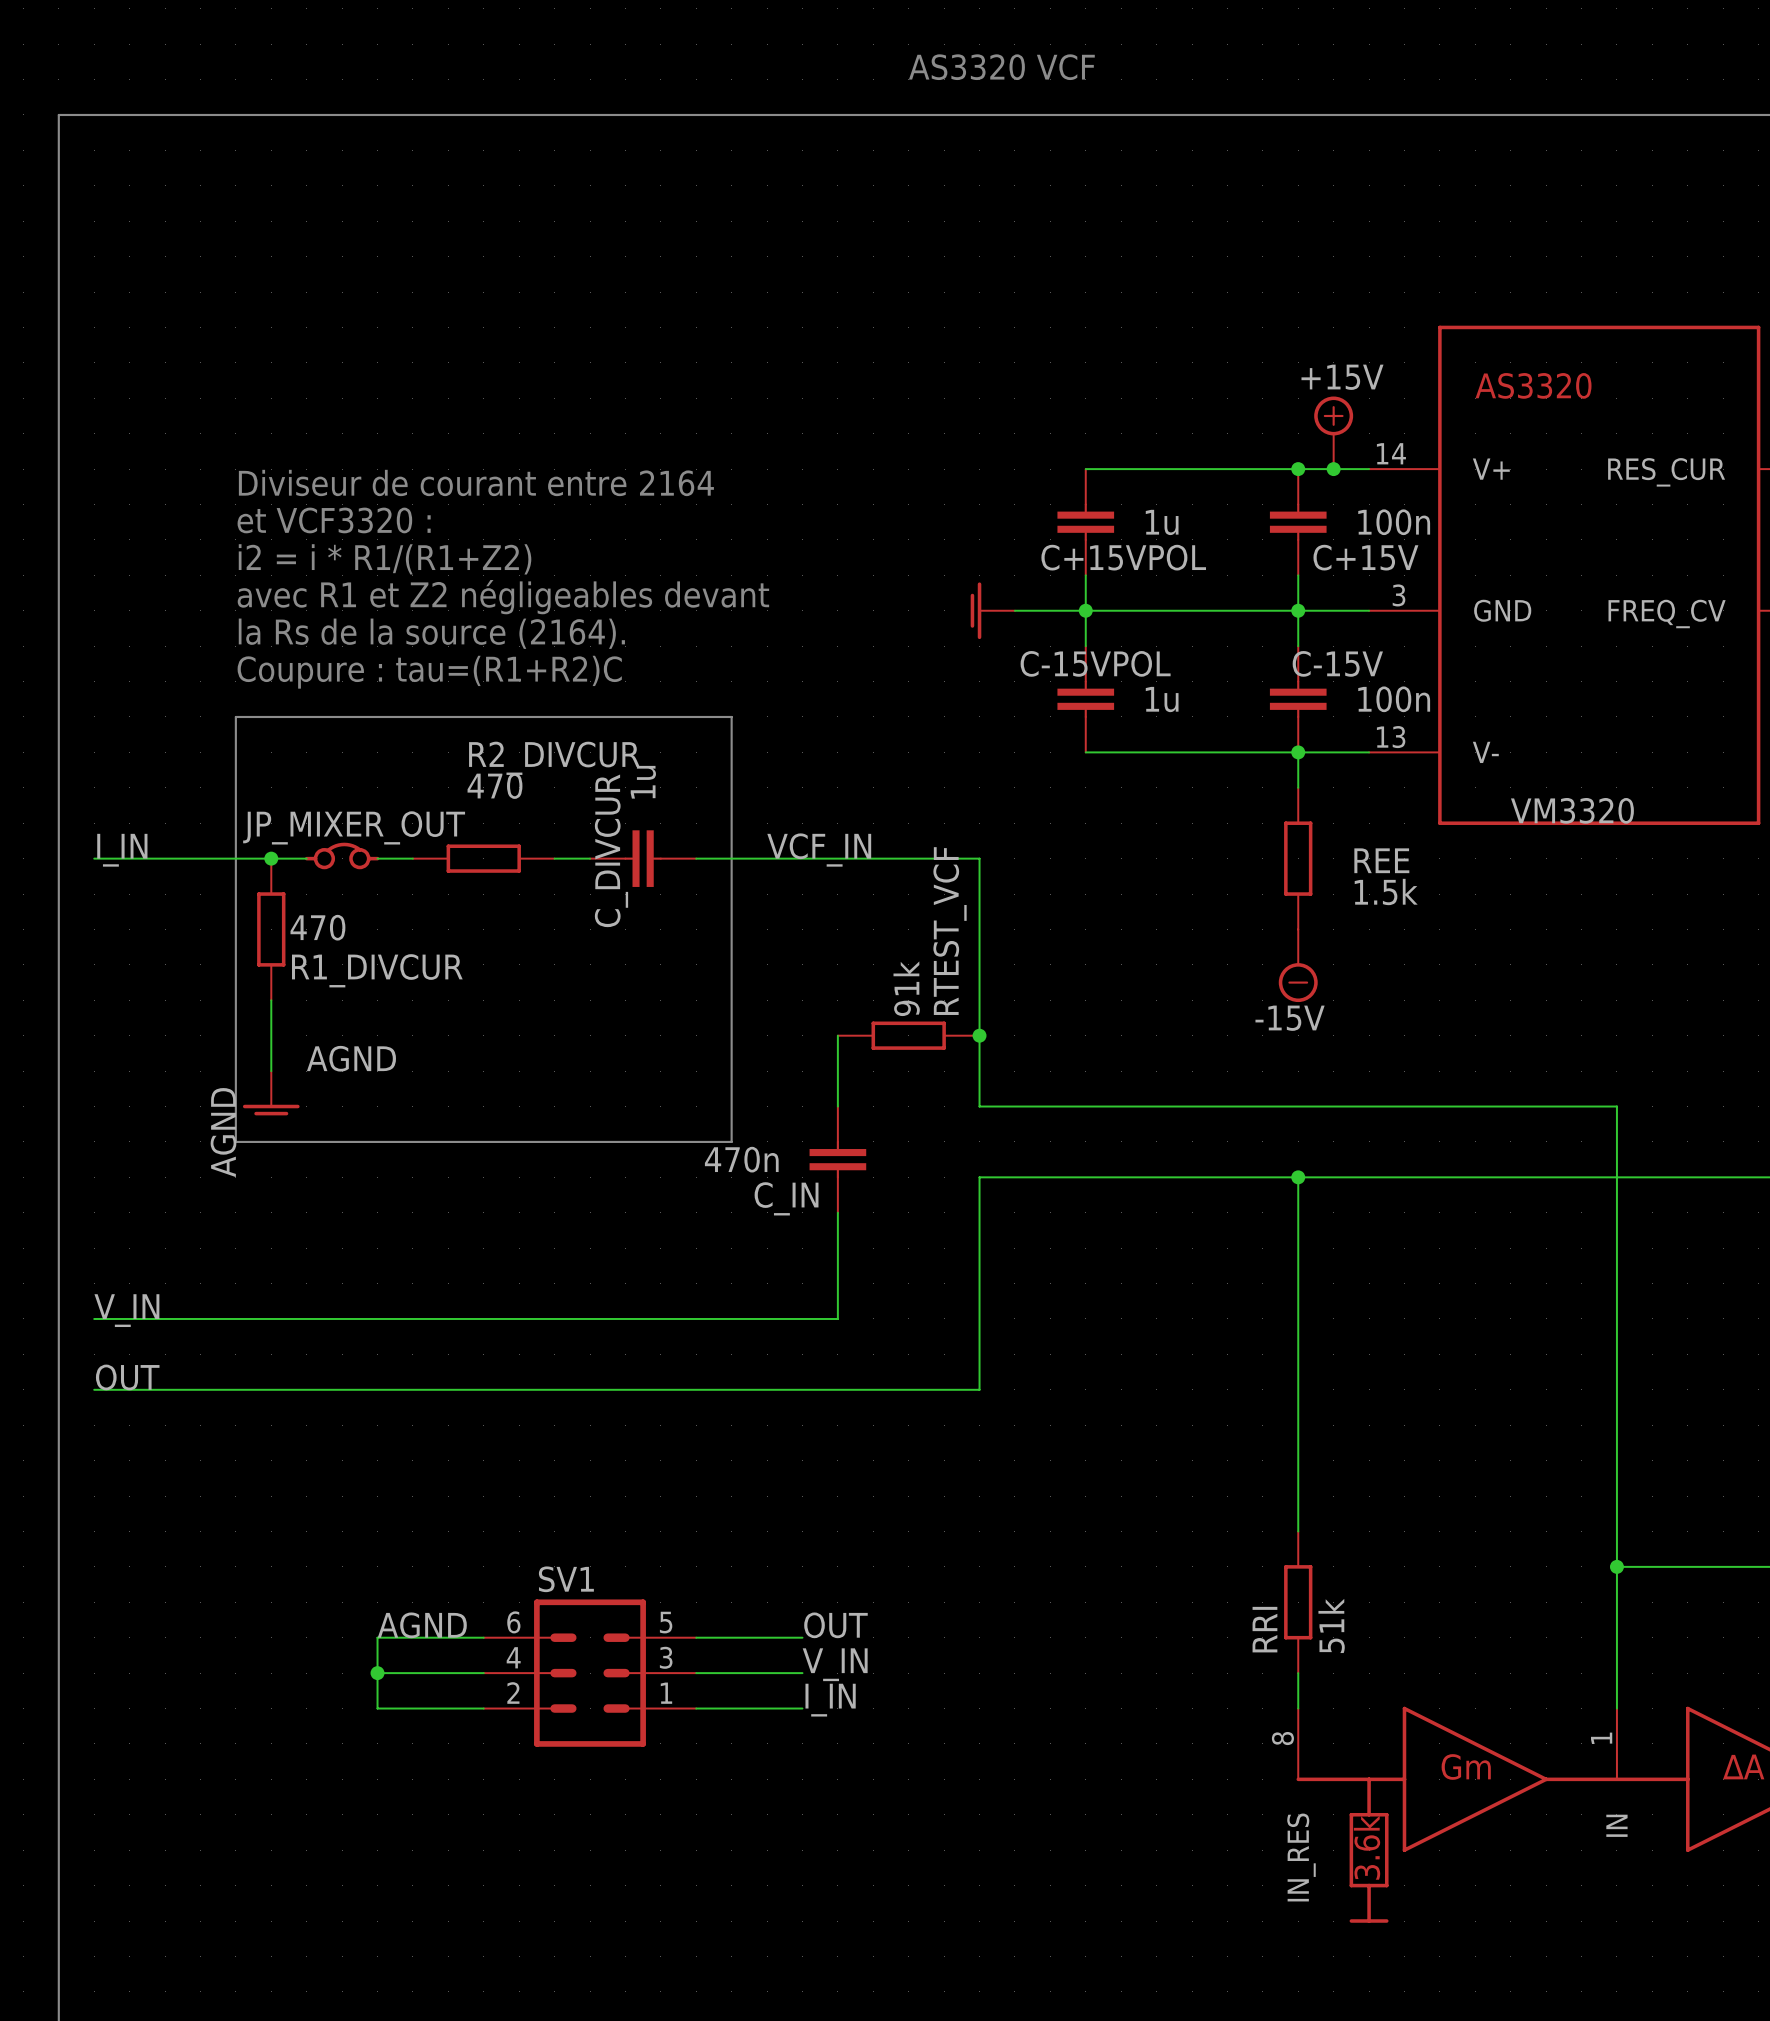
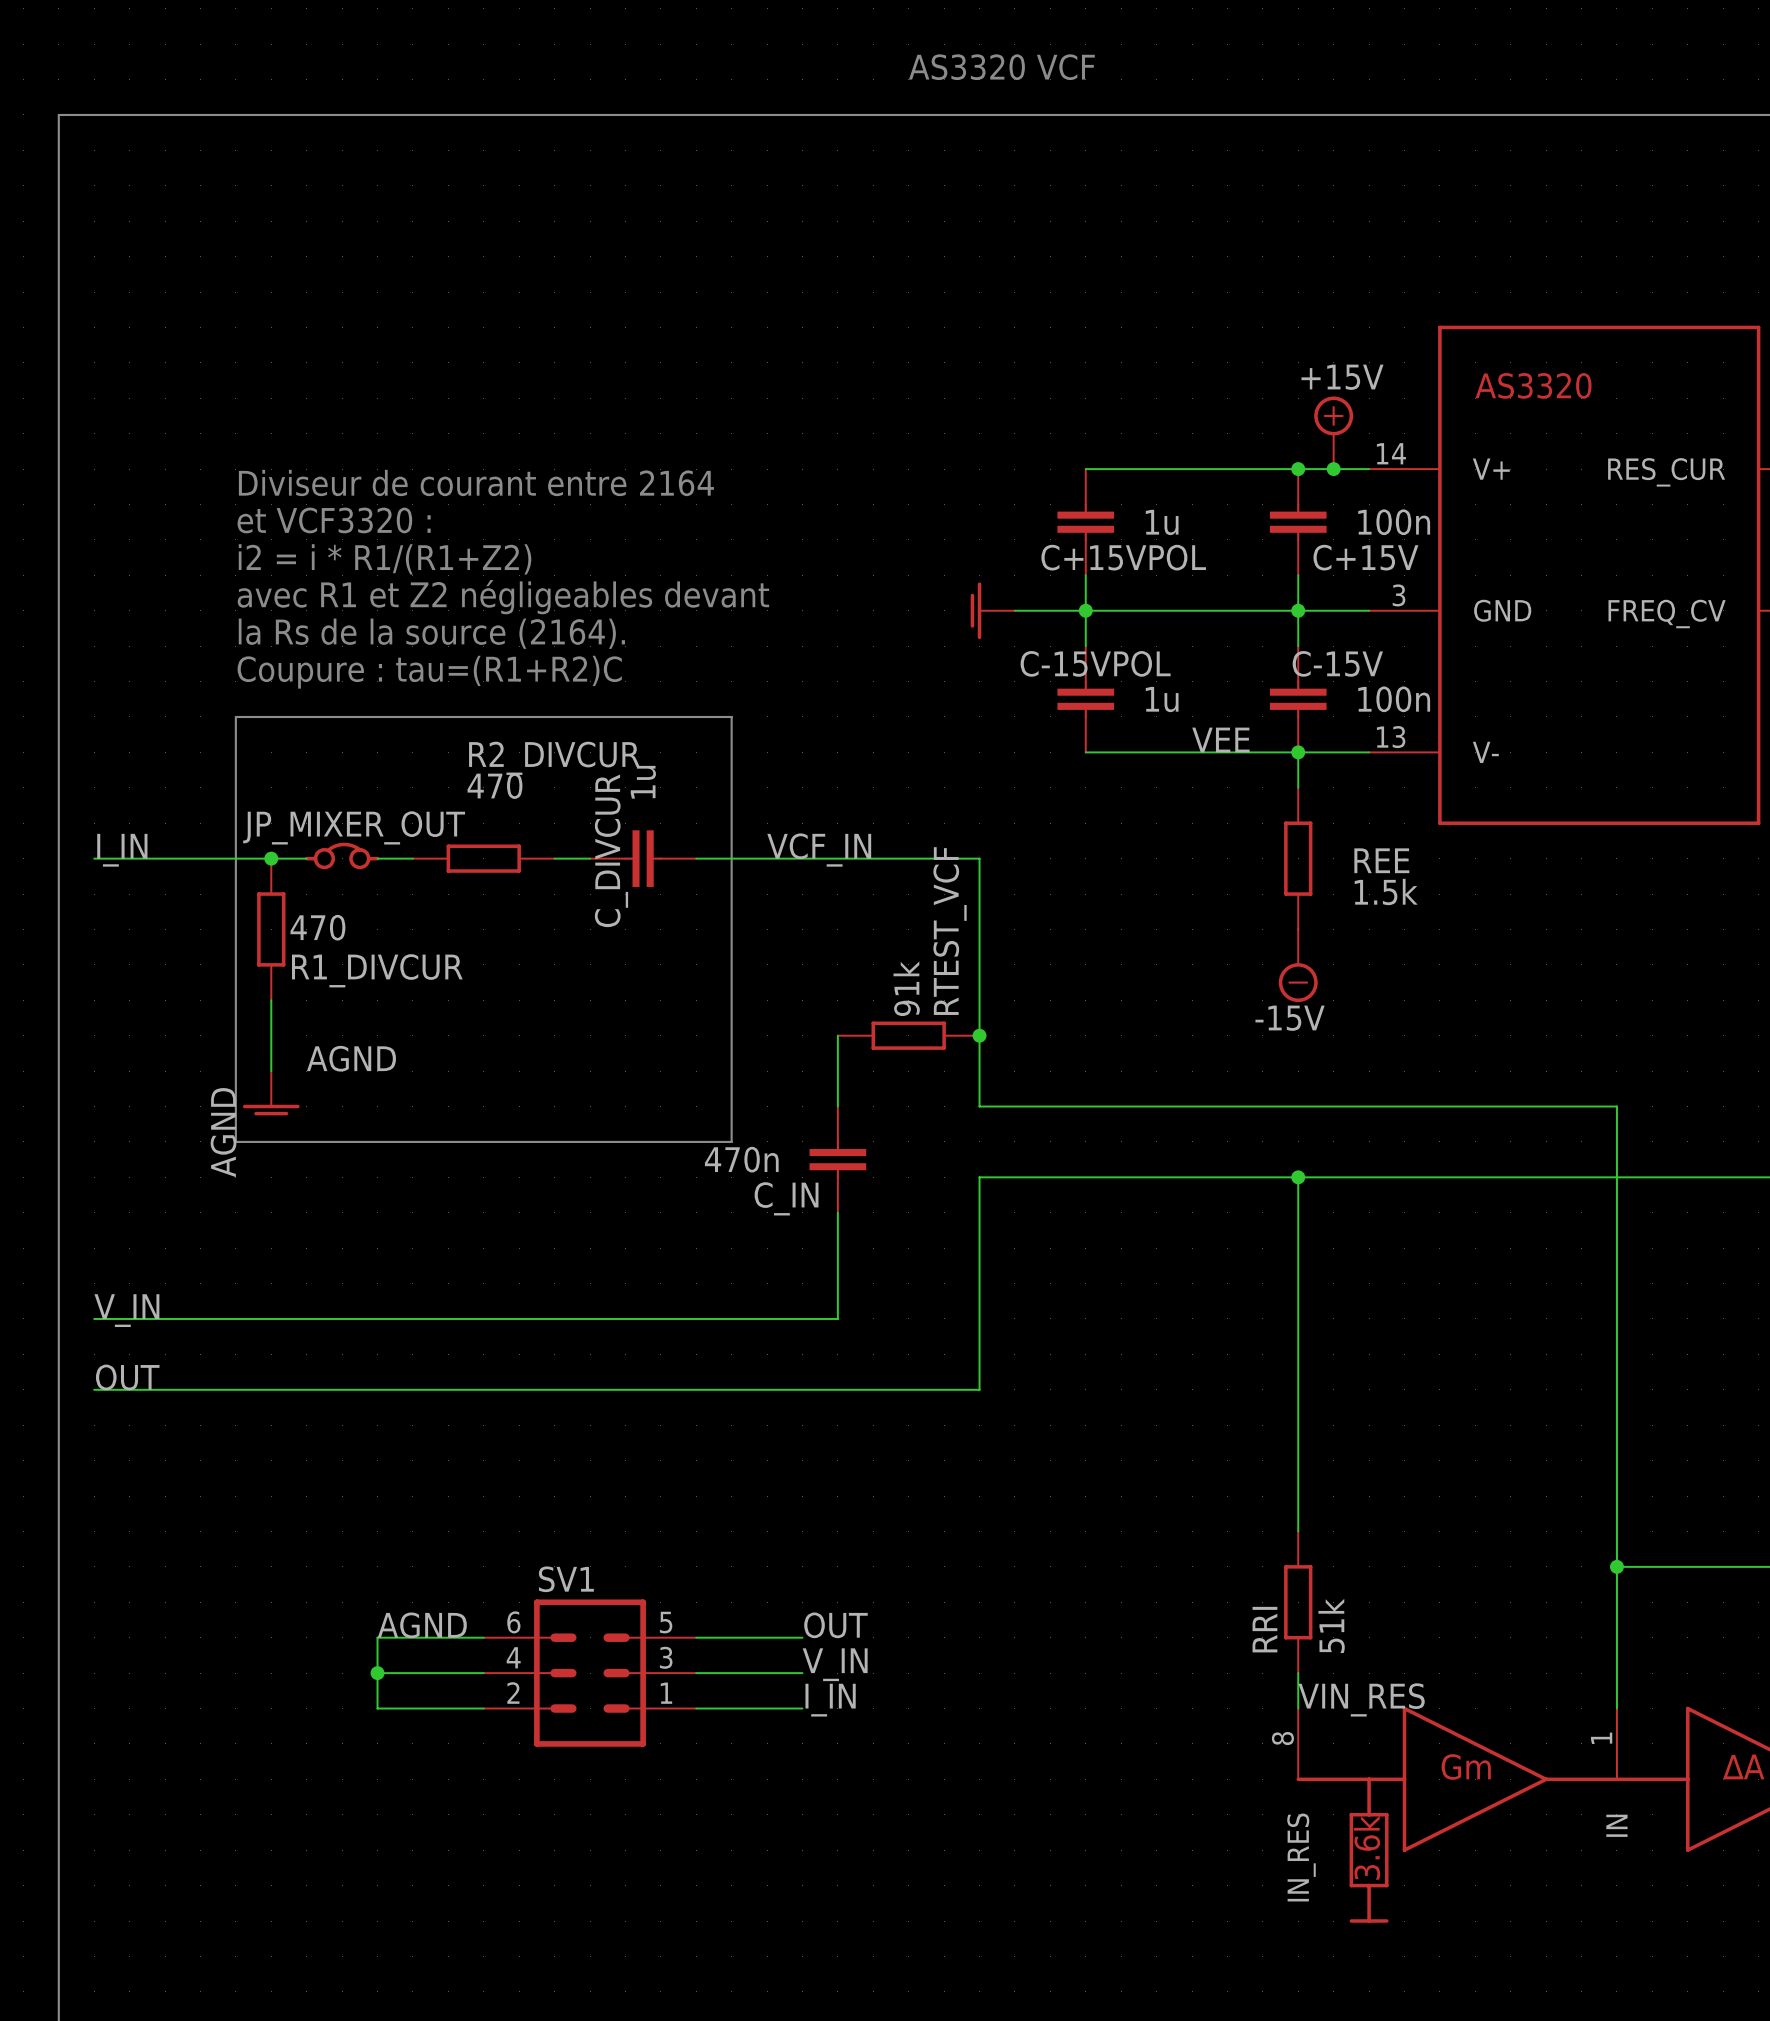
label: none -> VEE (1220, 740)
label: VM3320 (1572, 810) -> none
label: none -> VIN_RES (1361, 1699)

